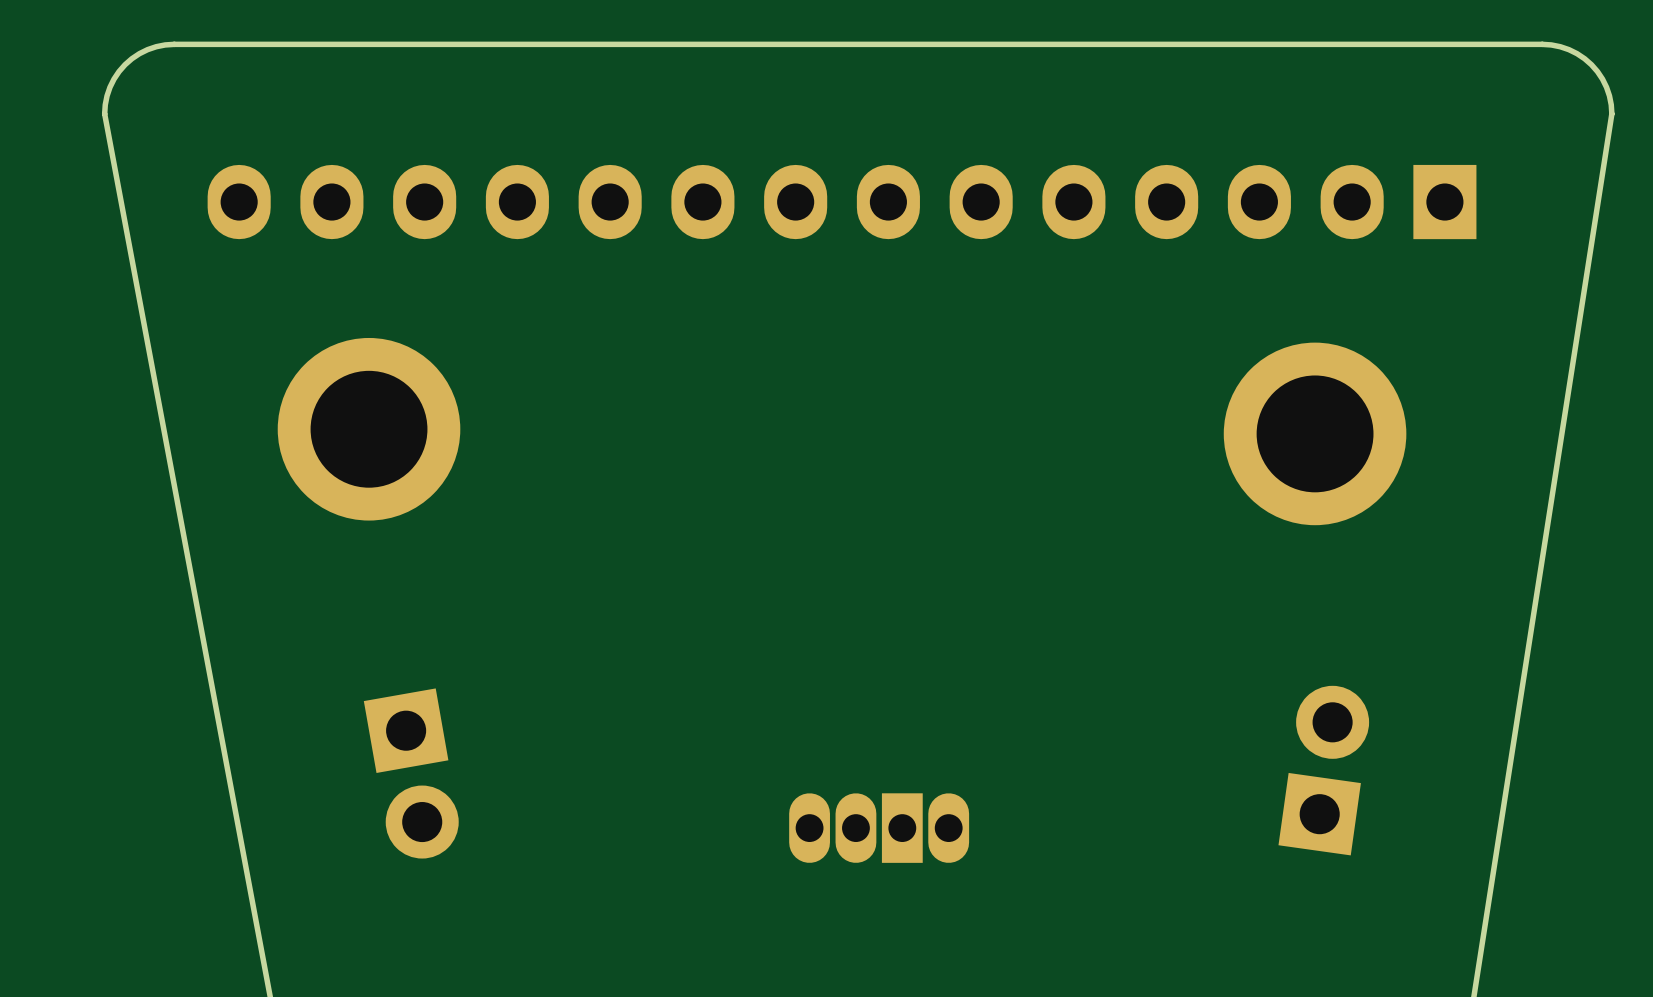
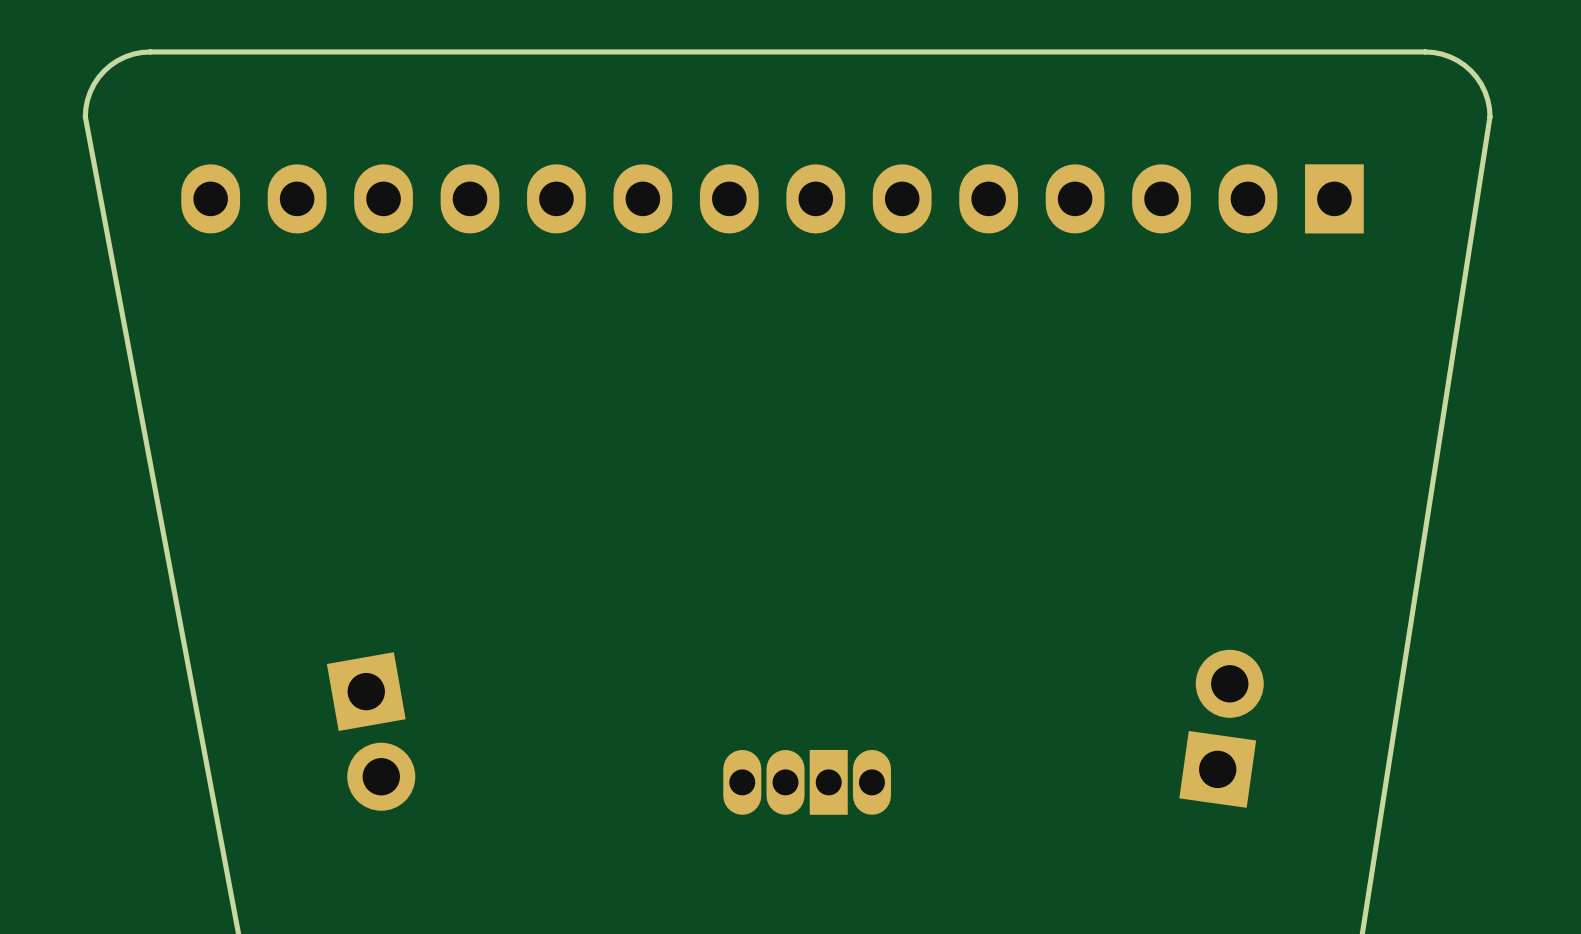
part: (369, 429) -> none
part: (1315, 433) -> none

